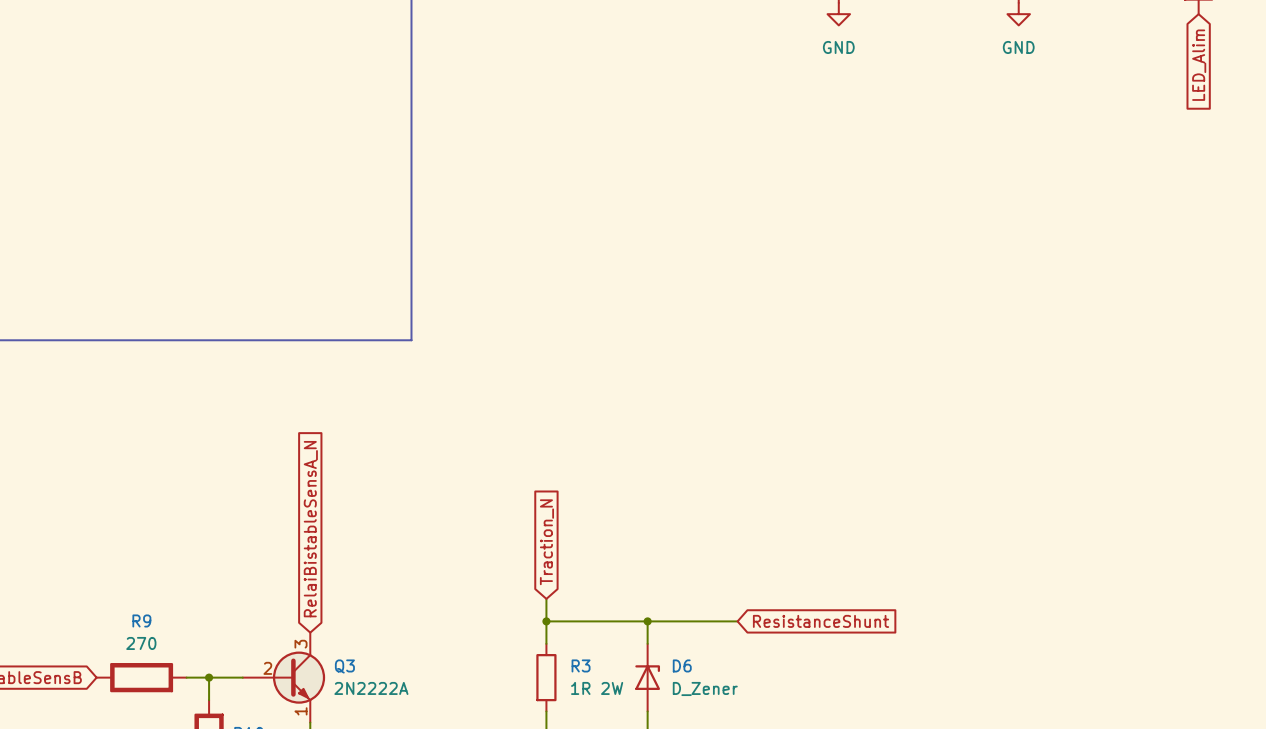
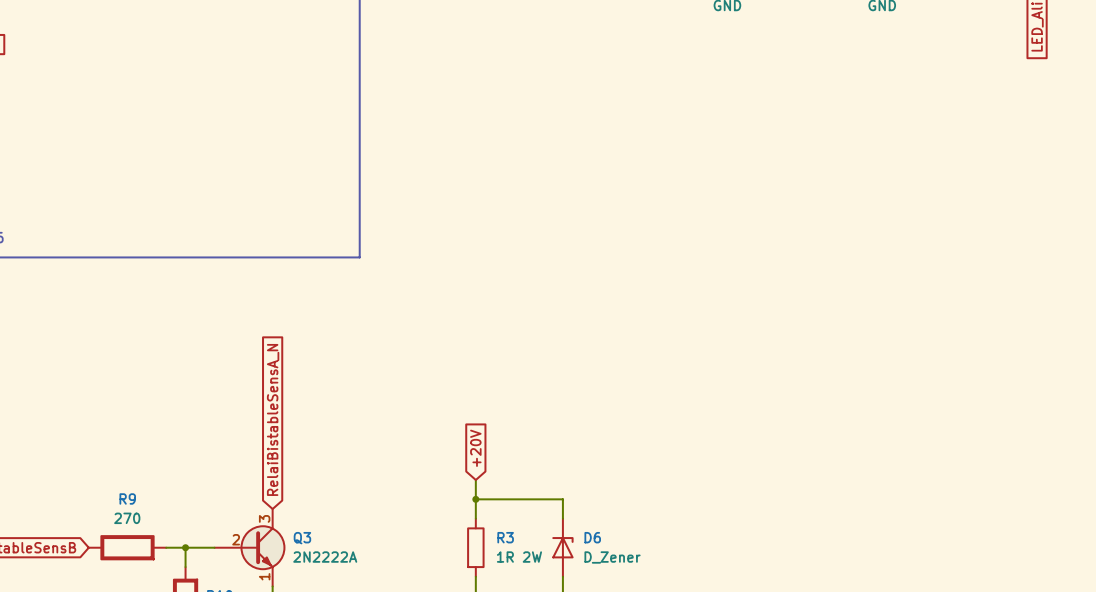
global label: Traction_N (546, 542) -> +20V (475, 448)
wire: (647, 621) (737, 621) -> none
junction: (647, 621) -> none
global label: ResistanceShunt (821, 621) -> none

